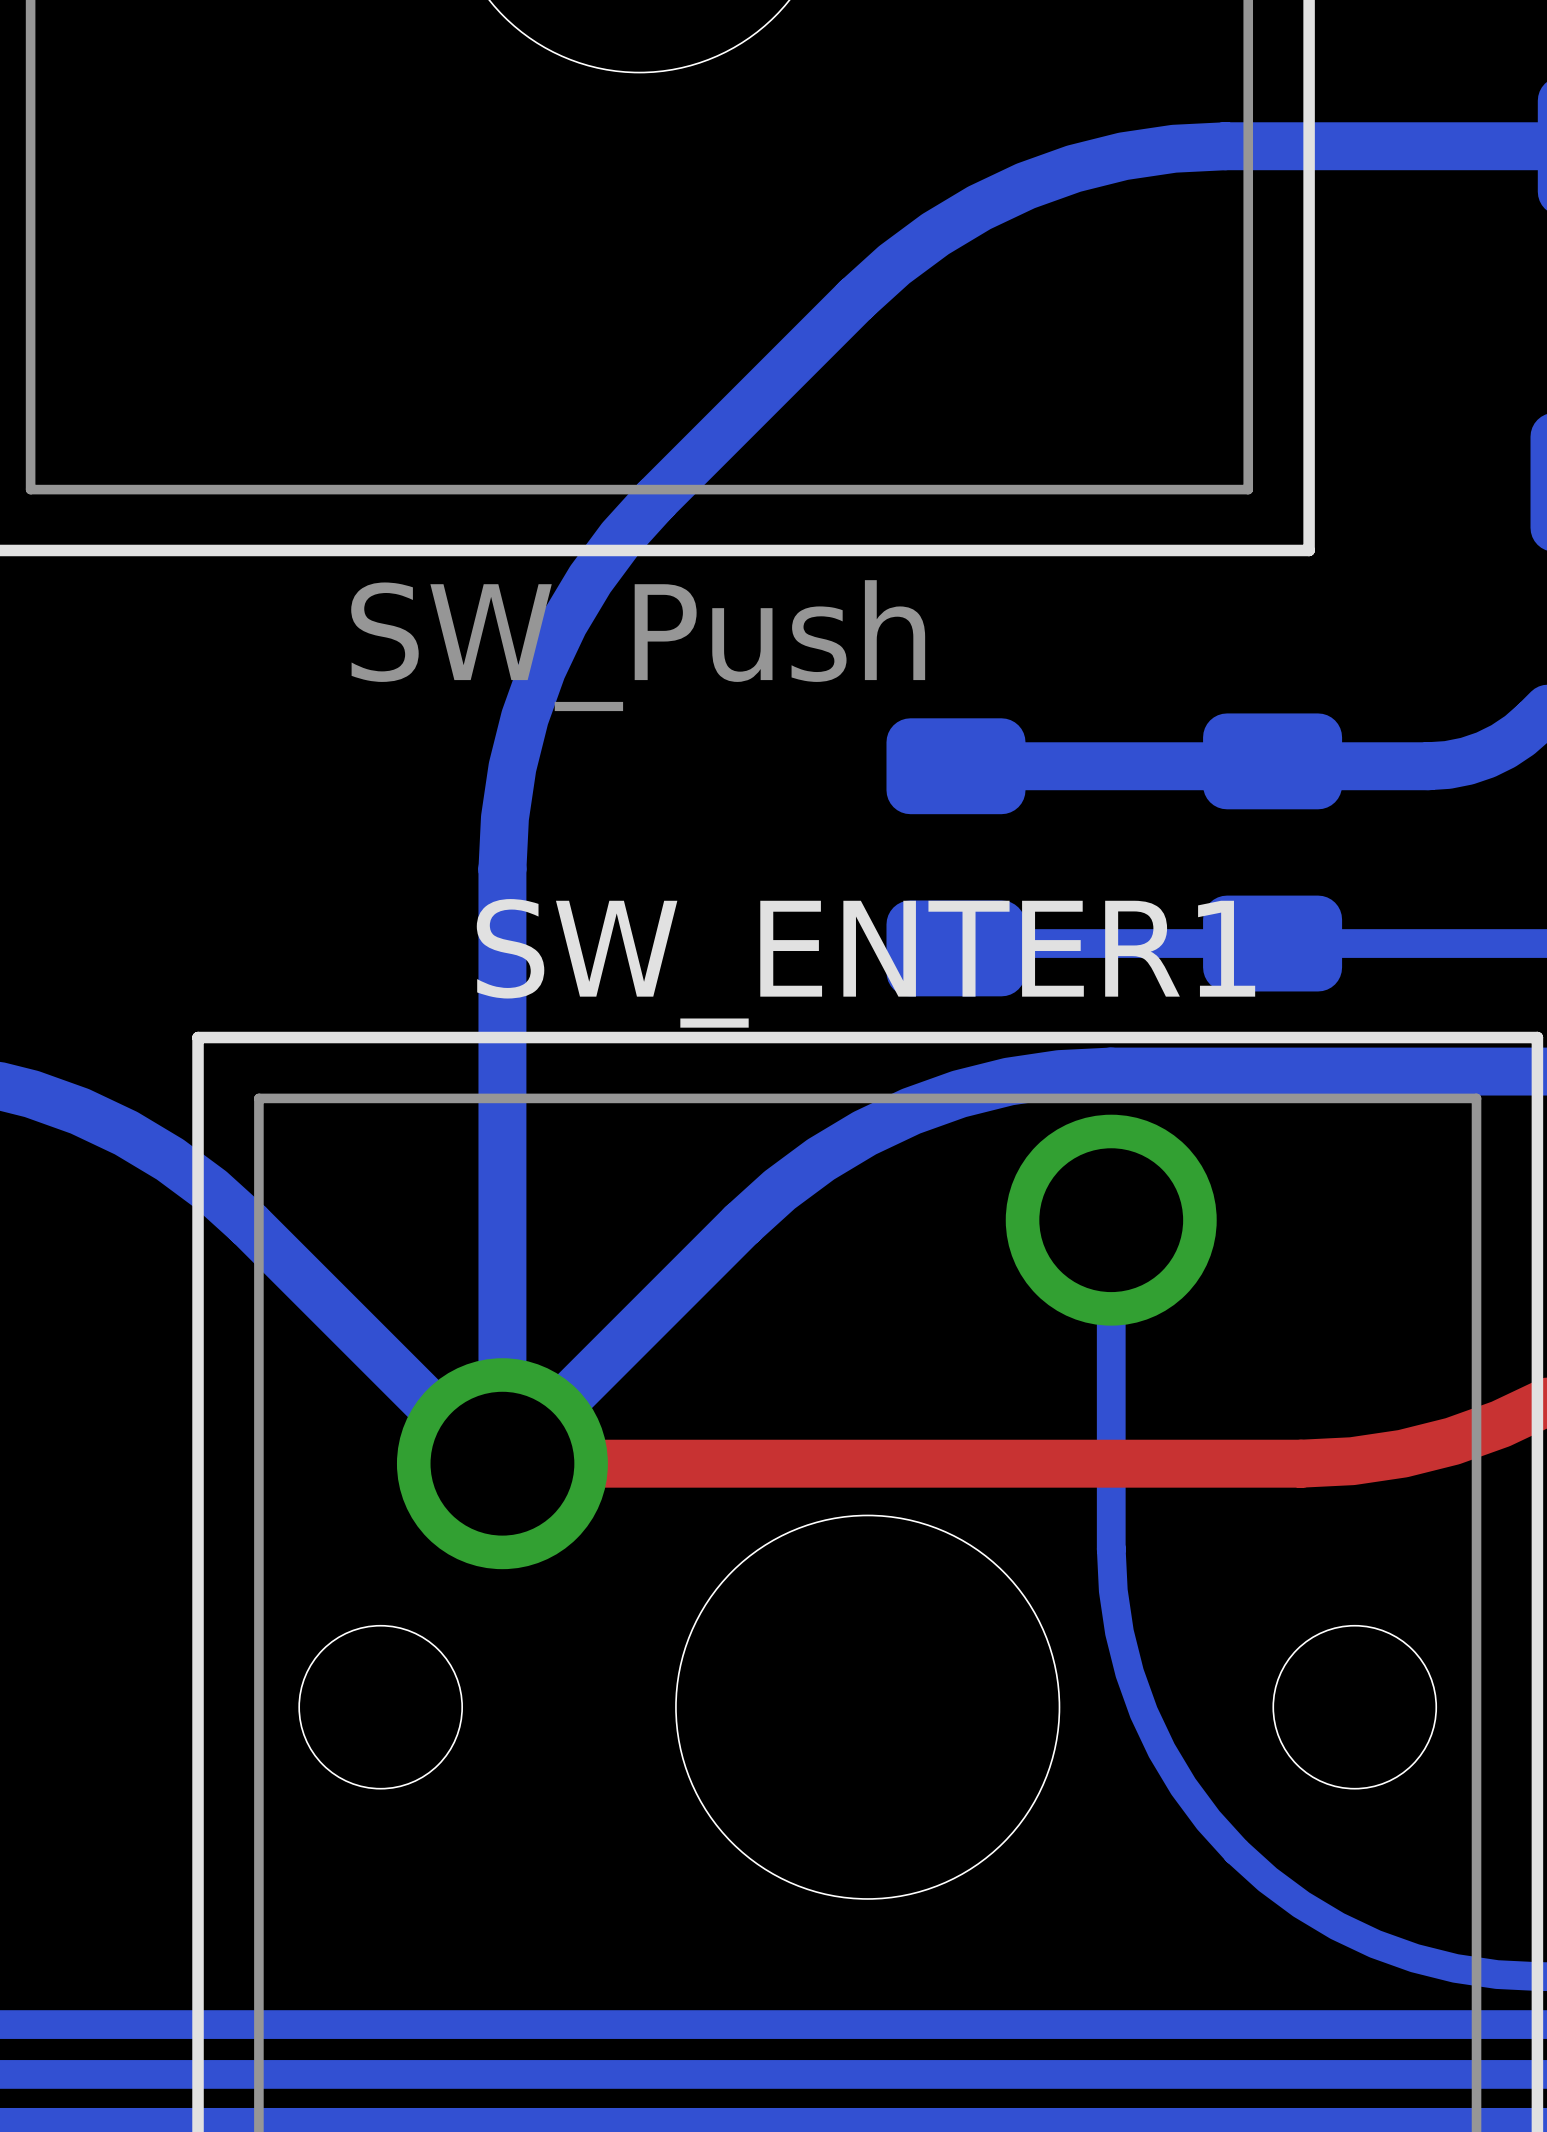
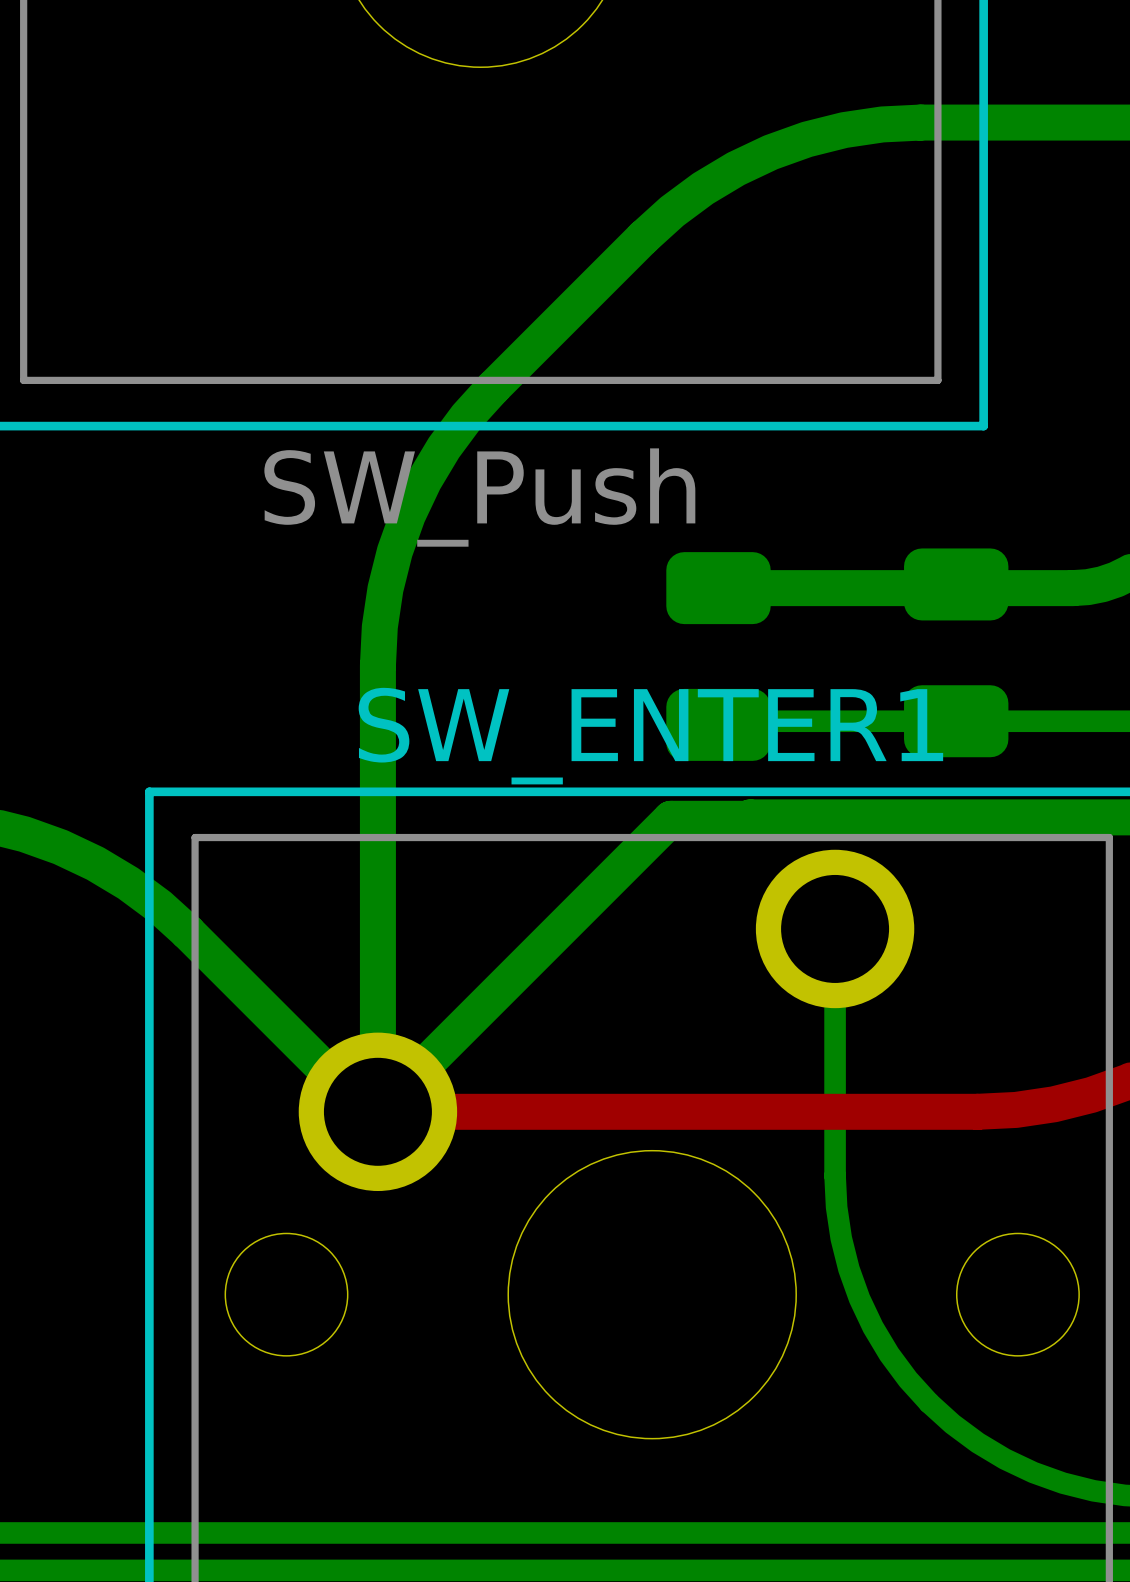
bottom track: (1110, 1071) (1059, 1074) (1008, 1081) (959, 1094) (911, 1111) (864, 1133) (820, 1159) (779, 1189) (741, 1224) -> (834, 817) (670, 818) (557, 932)

